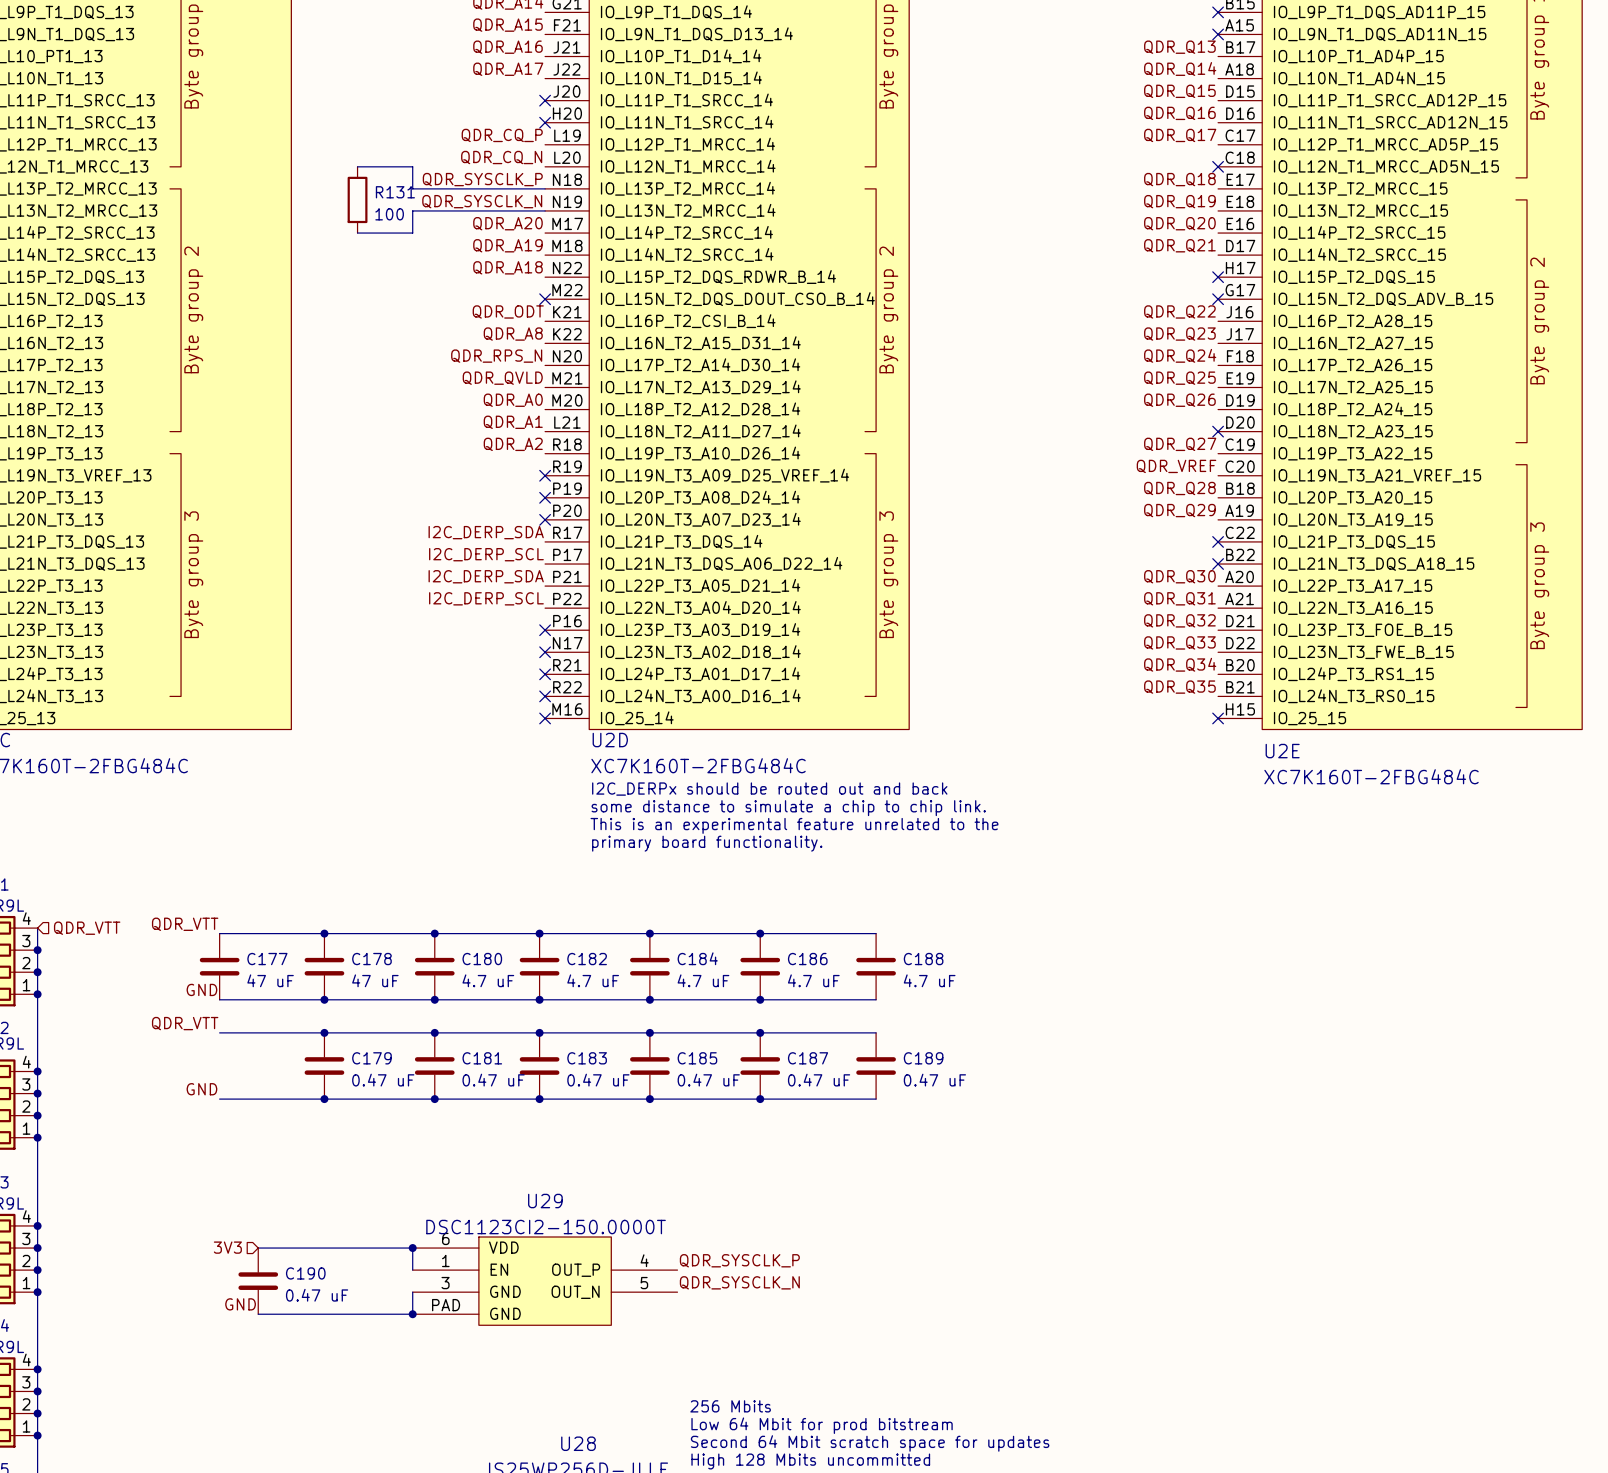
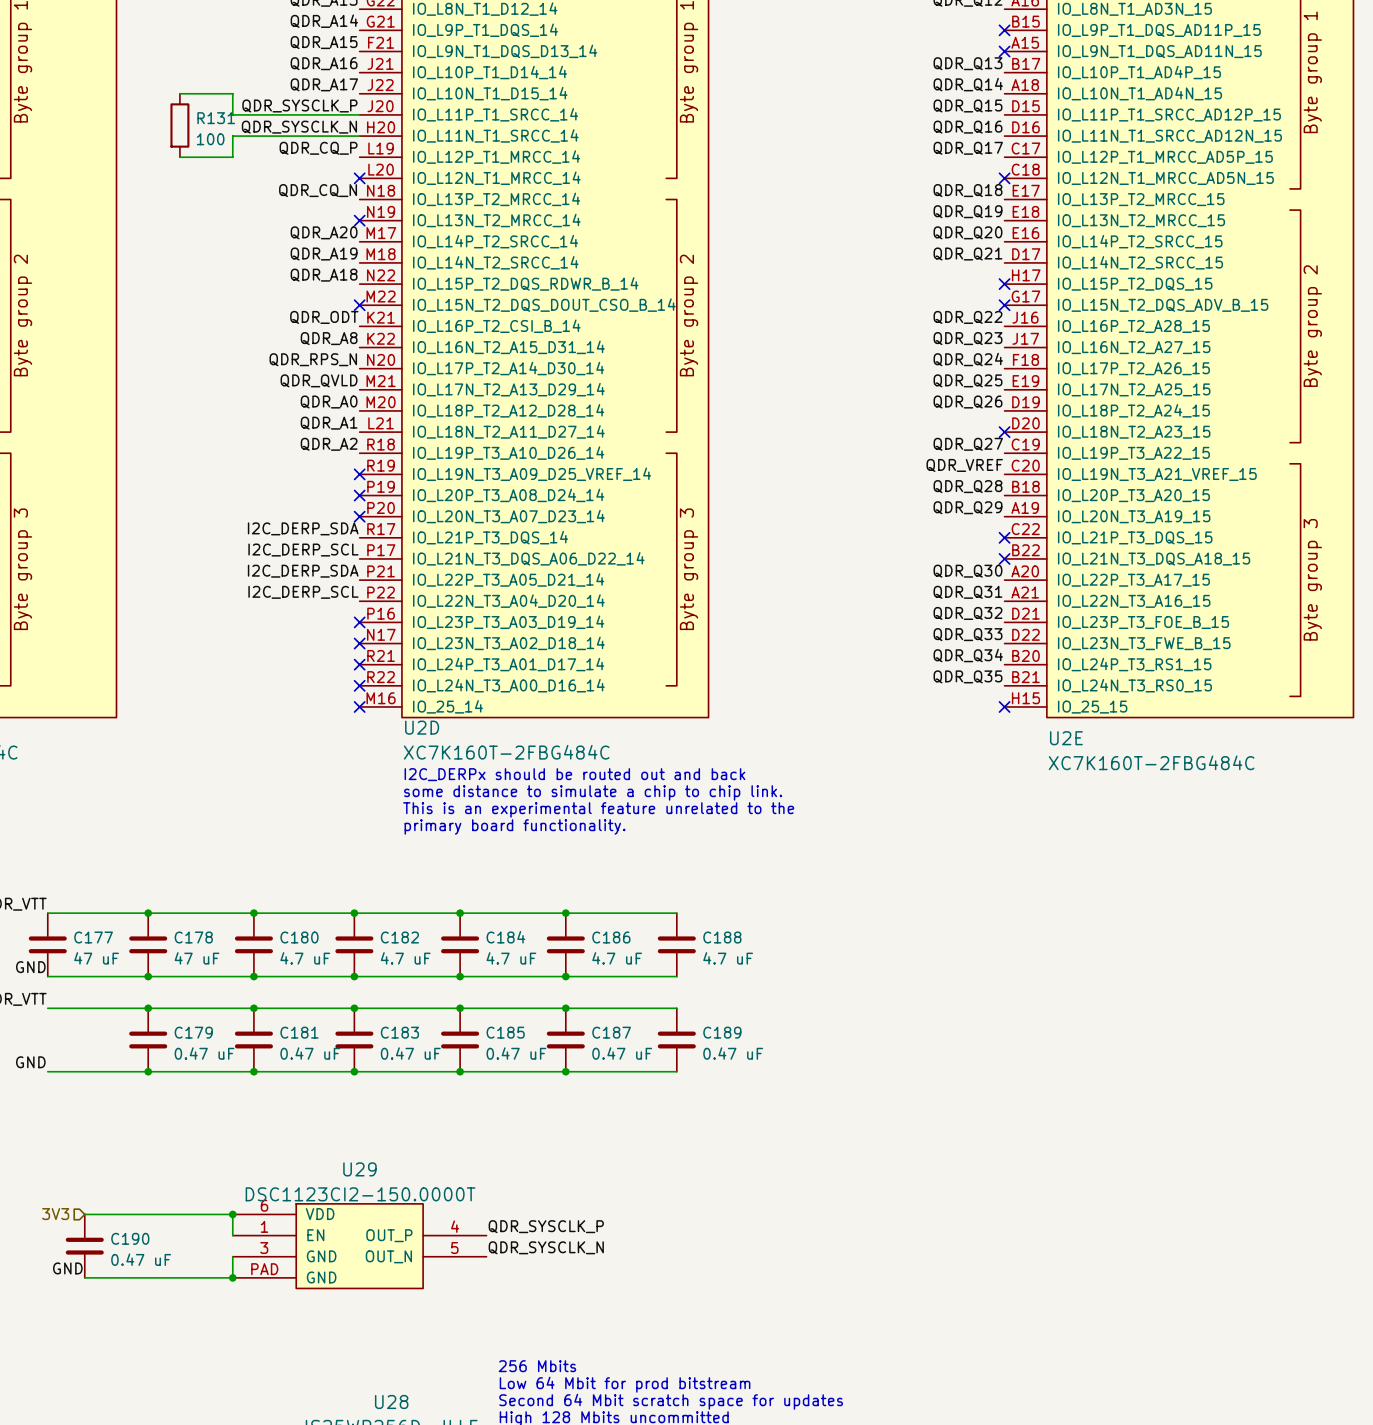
label: none -> QDR_SYSCLK_P (299, 106)
no-connect mark: (545, 100) -> none
no-connect mark: (545, 122) -> none
label: QDR_CQ_N (501, 157) -> none
wire: (357, 166) (412, 166) (412, 188) (545, 188) -> (179, 93) (232, 93) (232, 114) (359, 114)
no-connect mark: none -> (359, 178)
label: QDR_SYSCLK_P (482, 179) -> QDR_CQ_N (318, 190)
R131 position: (357, 199) -> (179, 125)
label position: QDR_SYSCLK_N (482, 201) -> QDR_SYSCLK_N (299, 127)
wire: (545, 210) (412, 210) (412, 233) (357, 233) -> (359, 136) (232, 136) (232, 157) (179, 157)
no-connect mark: none -> (359, 220)

